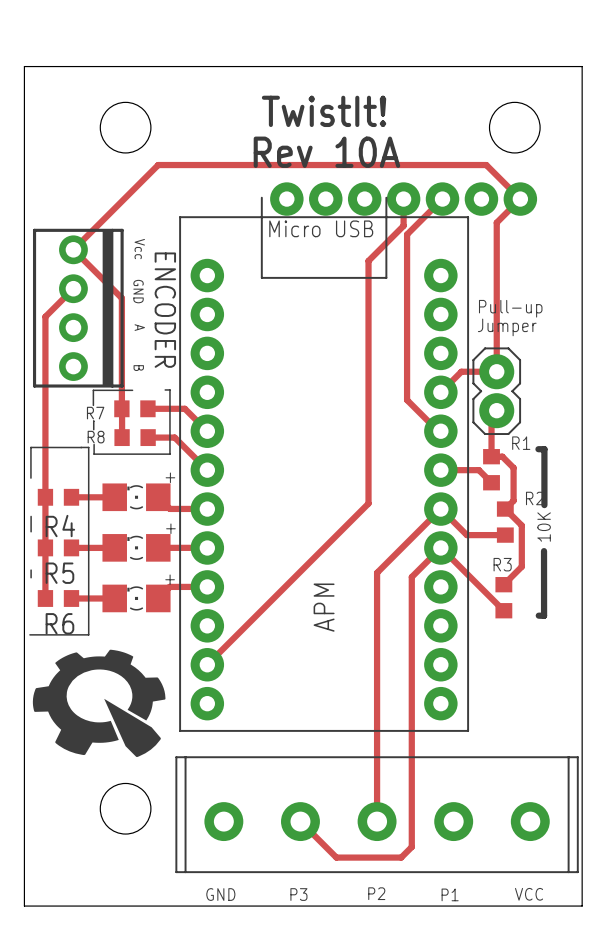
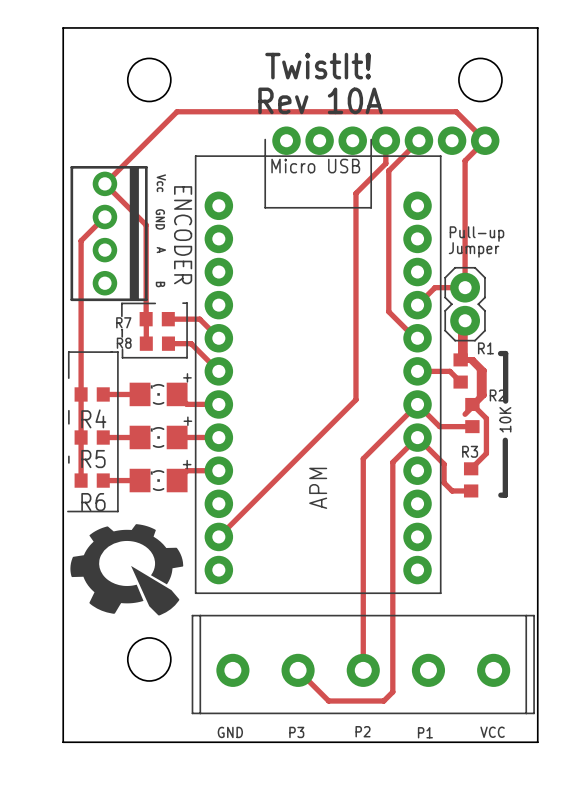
track: none -> (463, 321) (465, 359) (473, 359) (484, 370) (484, 395) (465, 414)
track: (441, 547) (503, 610) -> (417, 437) (444, 464) (444, 482) (452, 490) (465, 490)

